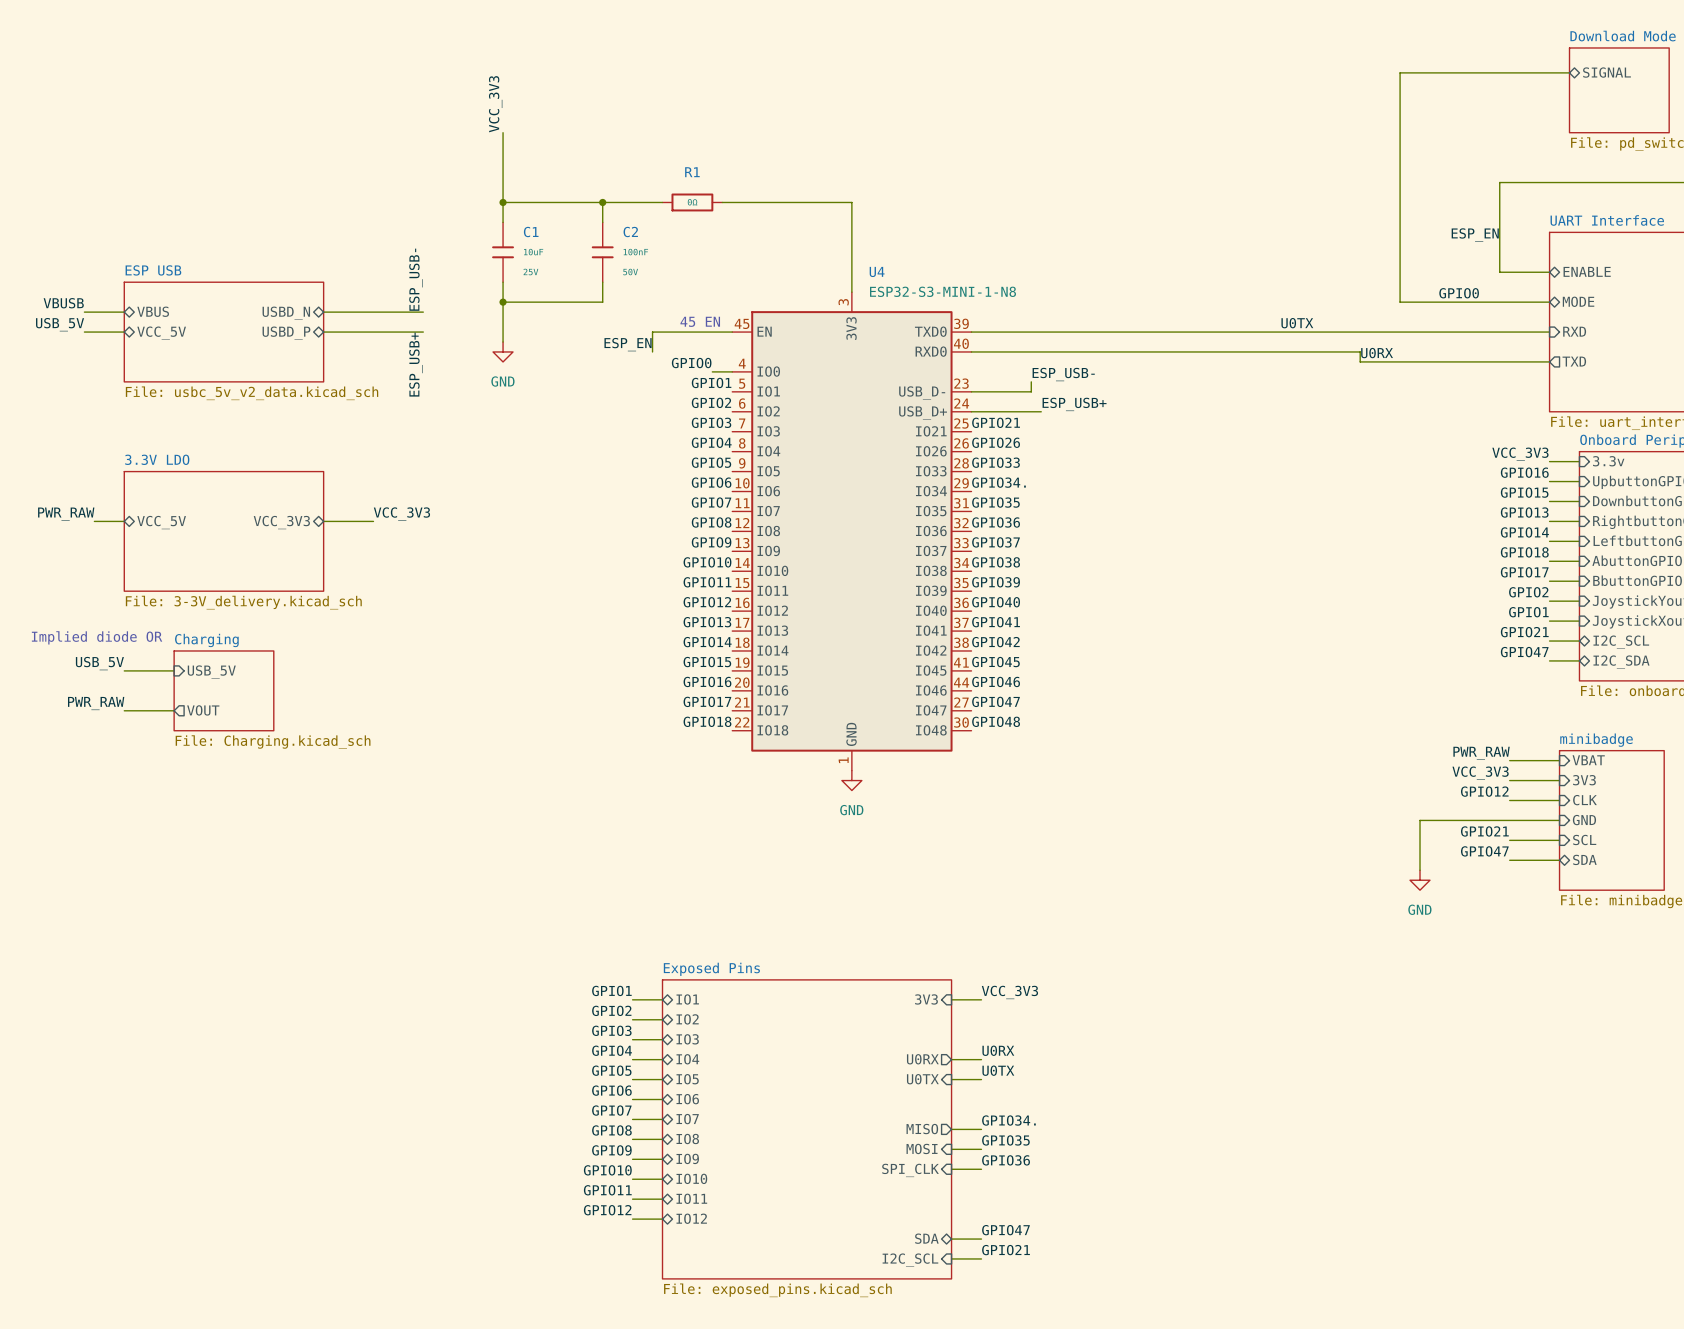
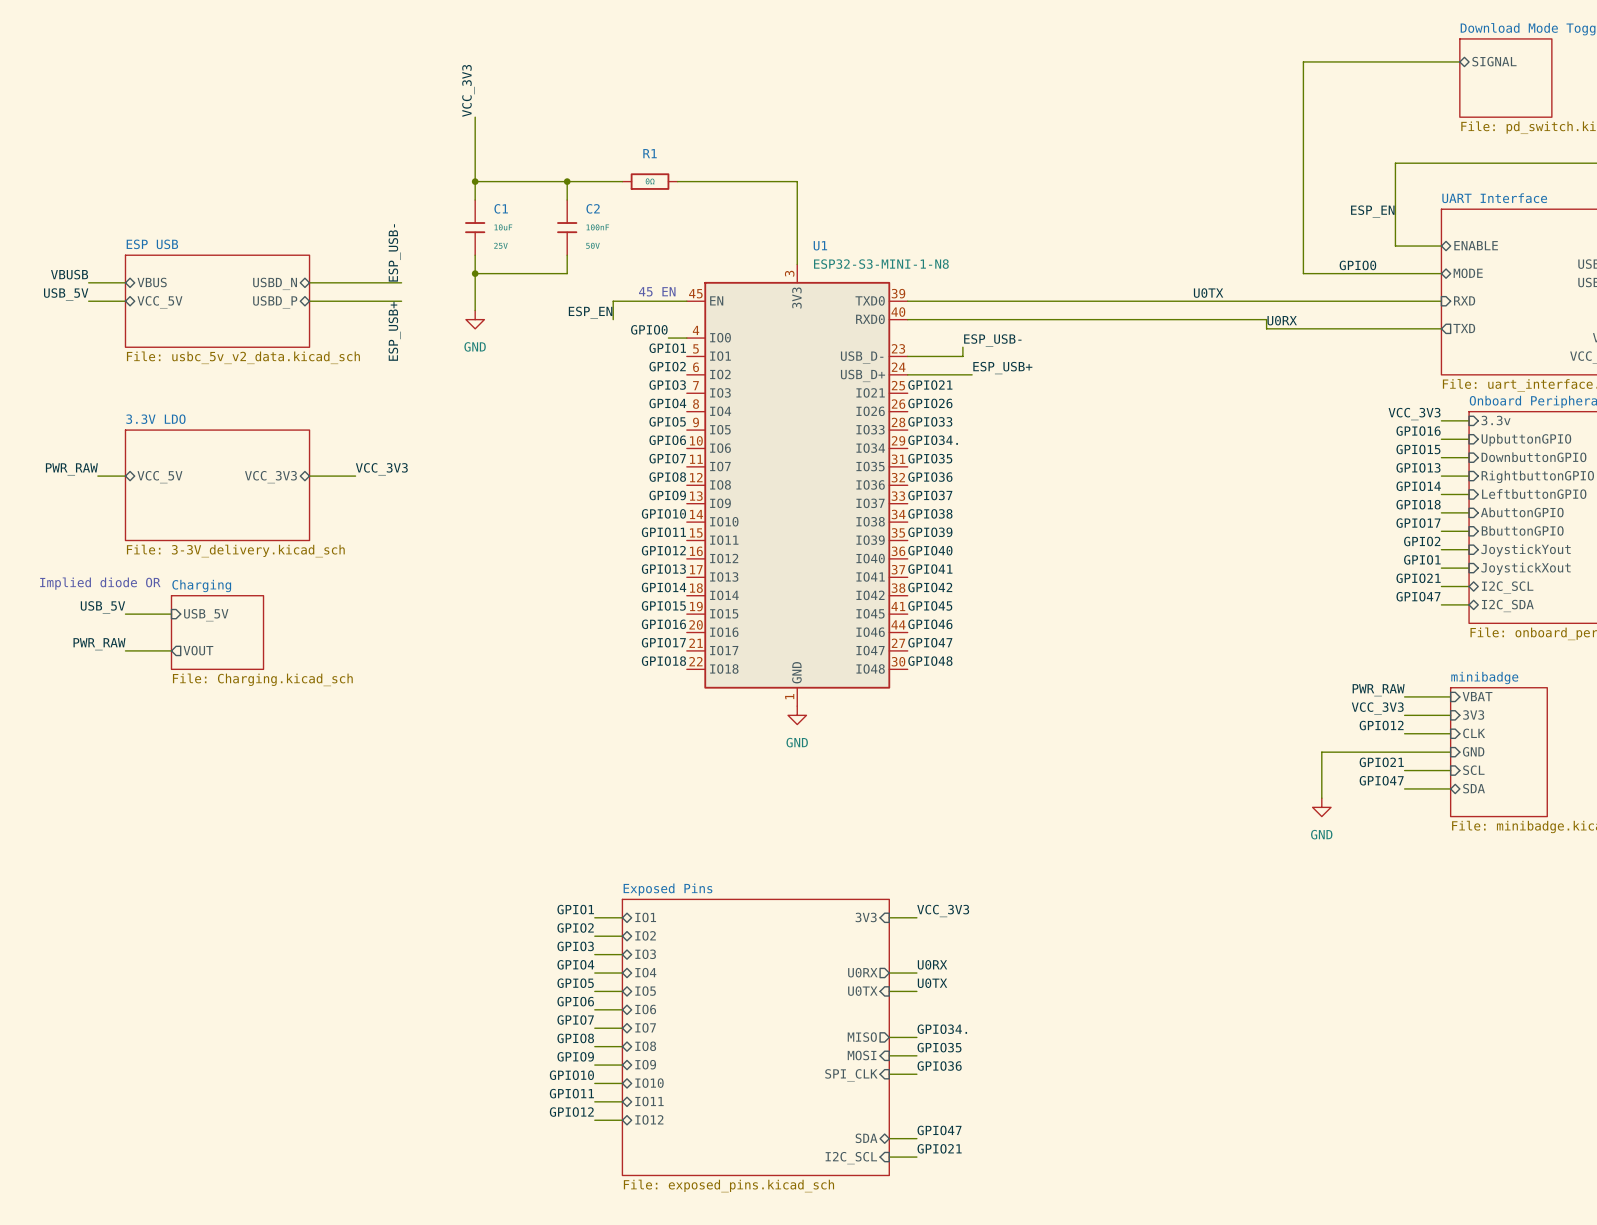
U4 name: U4 (877, 271) -> U1 (820, 245)

